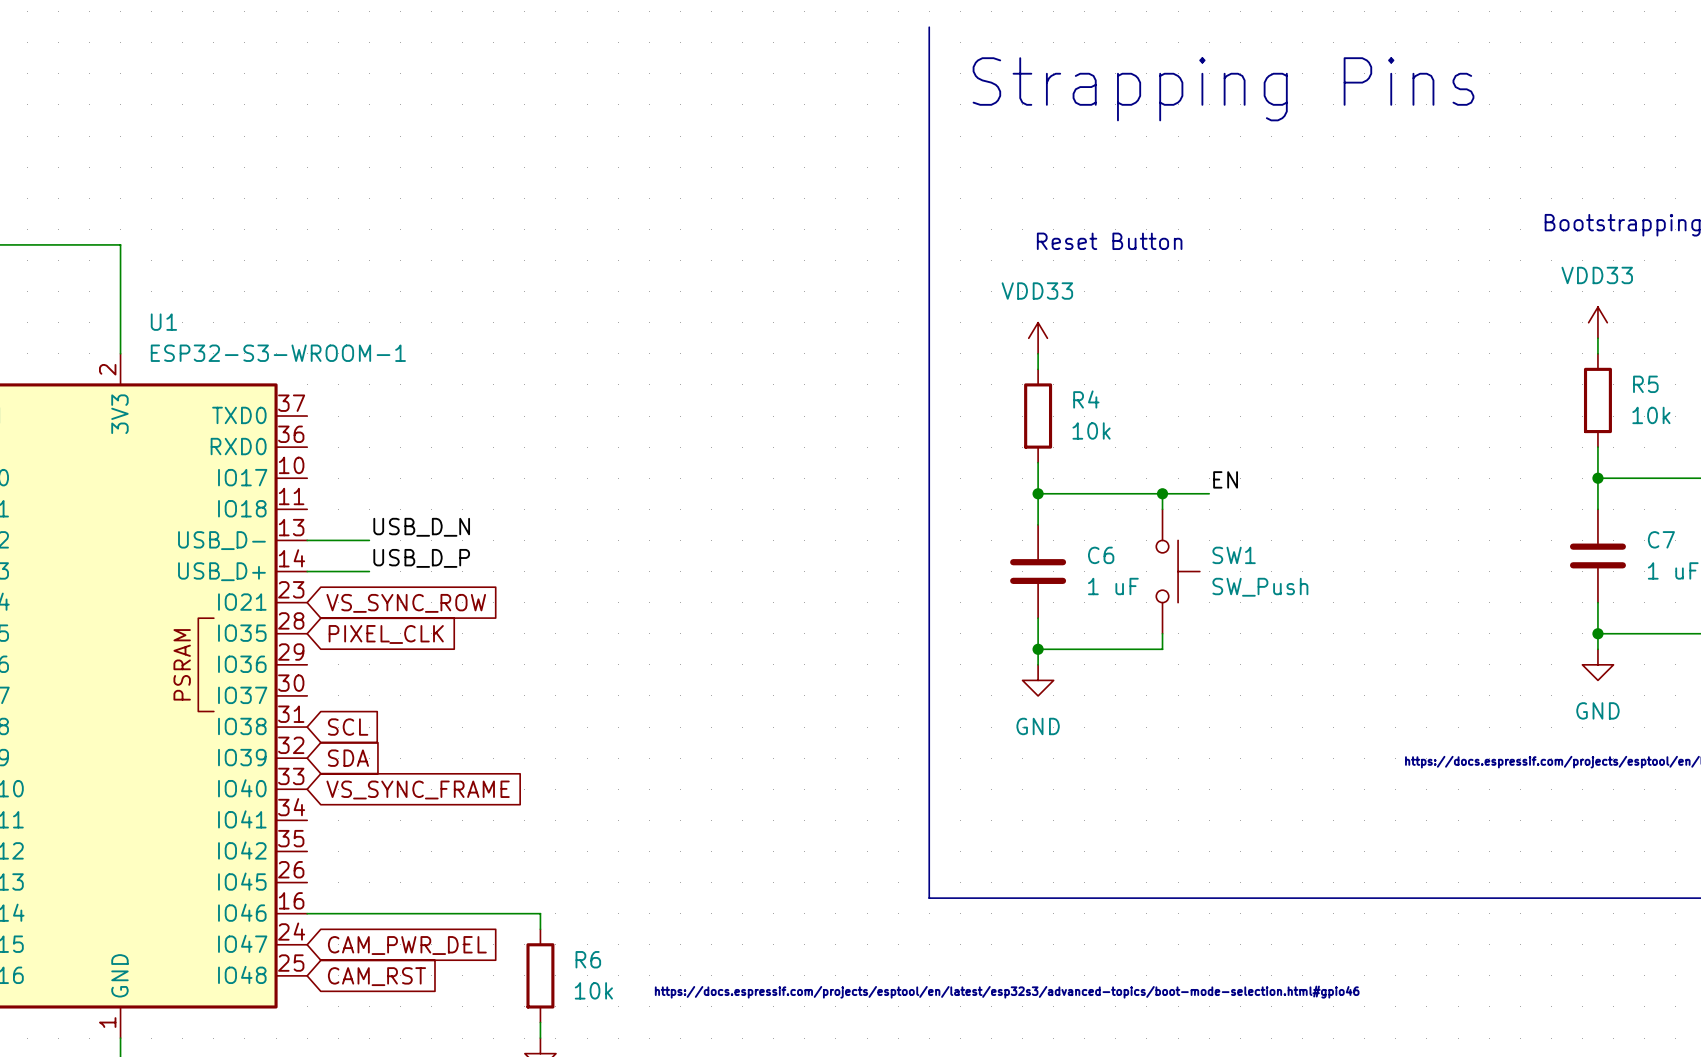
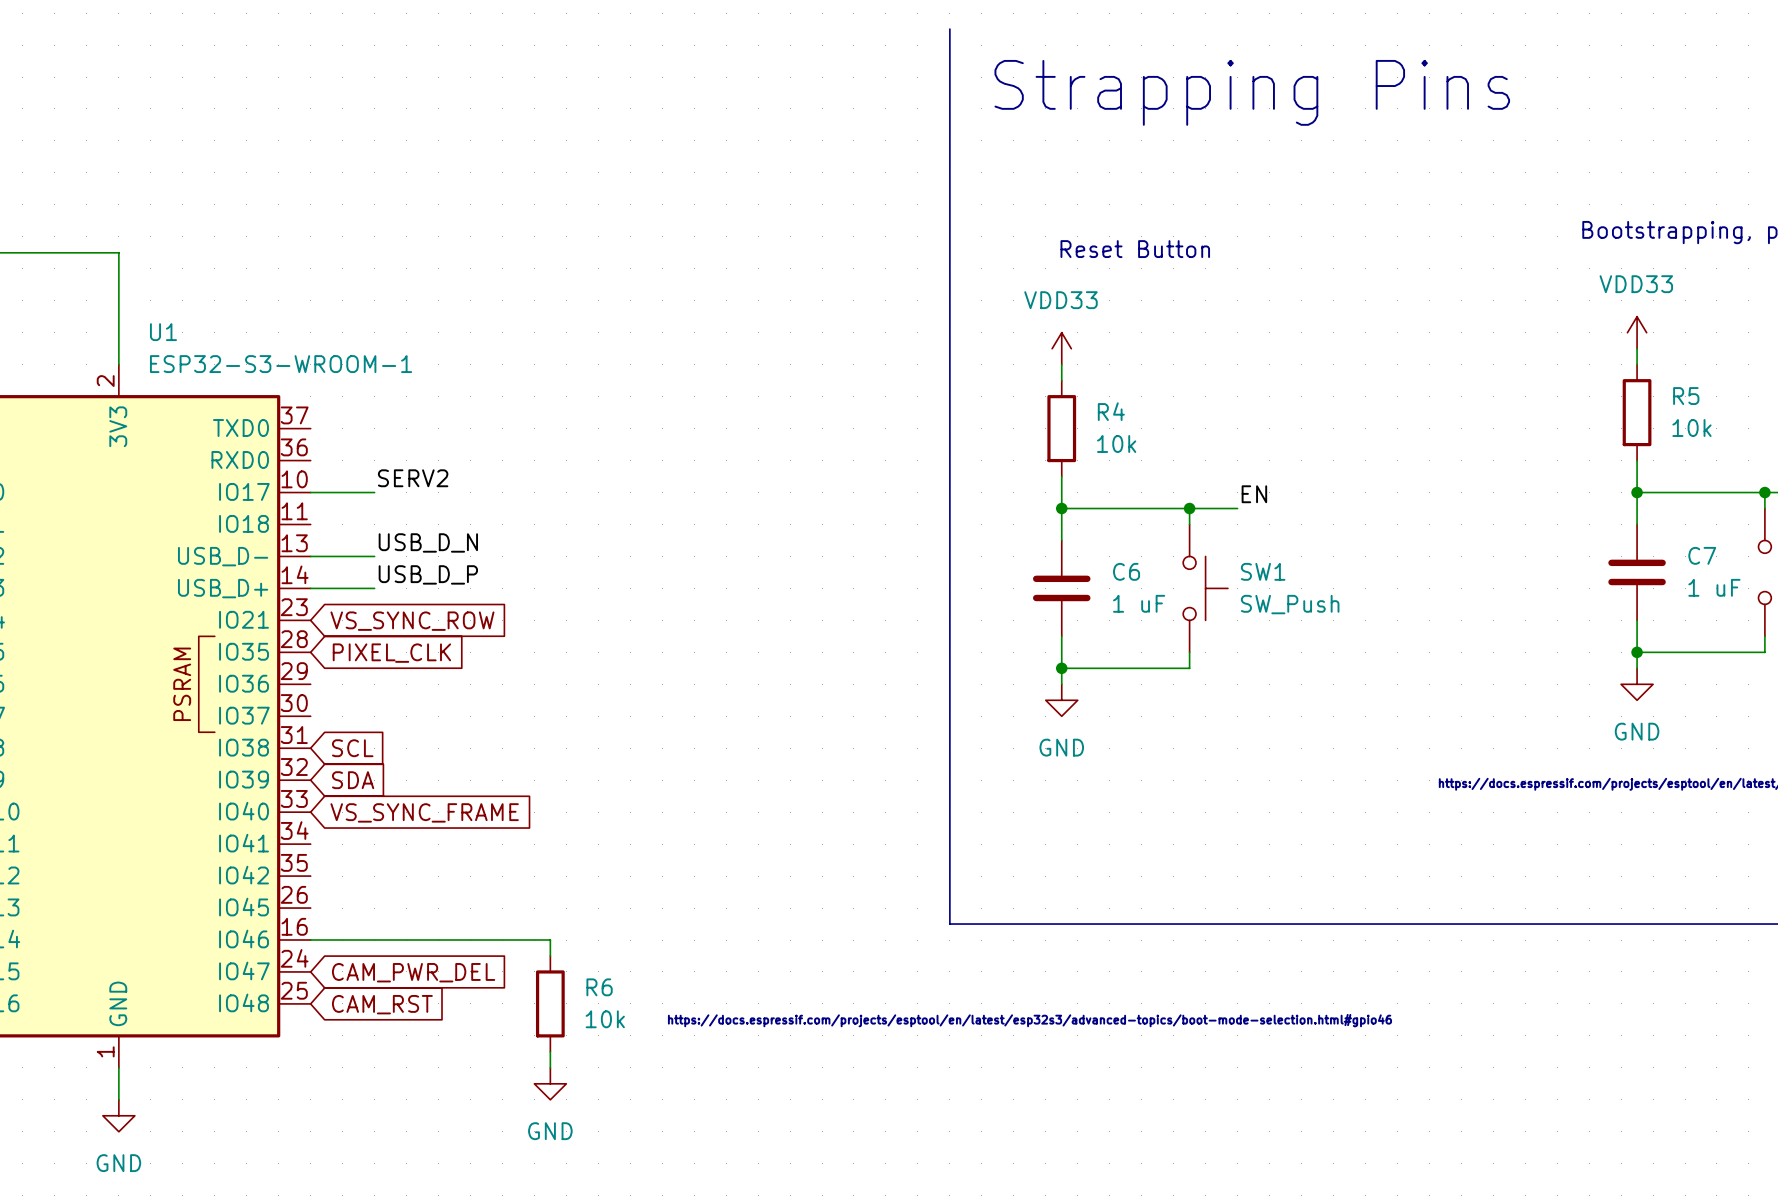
label: none -> SERV2 (413, 478)
wire: none -> (310, 492) (374, 492)

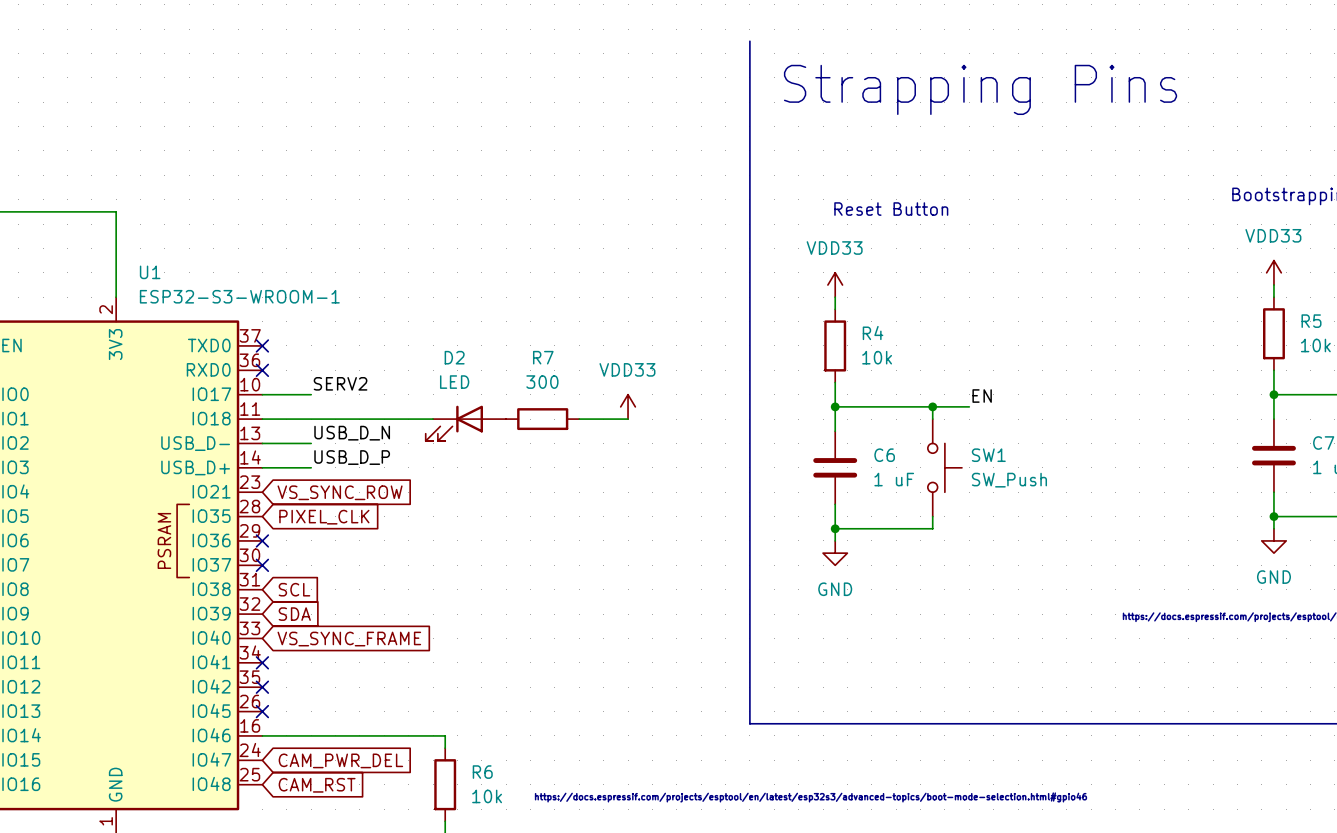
no-connect mark: none -> (262, 345)
no-connect mark: none -> (262, 370)
power symbol: none -> VDD33 (628, 406)
wire: none -> (262, 419) (433, 419)
R7: none -> 300 (542, 419)
wire: none -> (579, 419) (628, 419)
D2: none -> LED (465, 423)
no-connect mark: none -> (262, 540)
no-connect mark: none -> (262, 565)
no-connect mark: none -> (262, 662)
no-connect mark: none -> (262, 687)
no-connect mark: none -> (262, 711)

